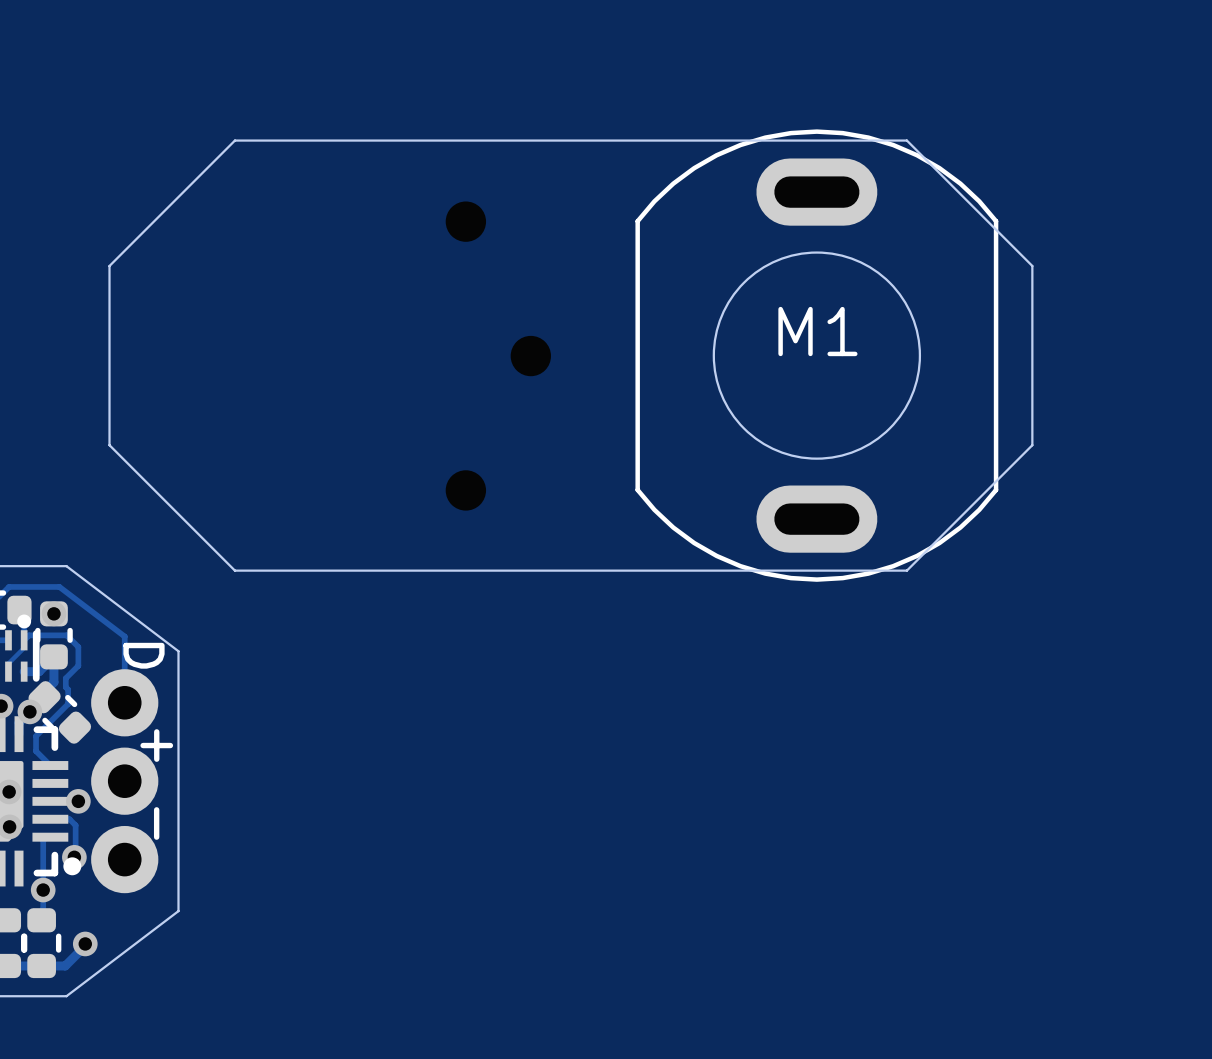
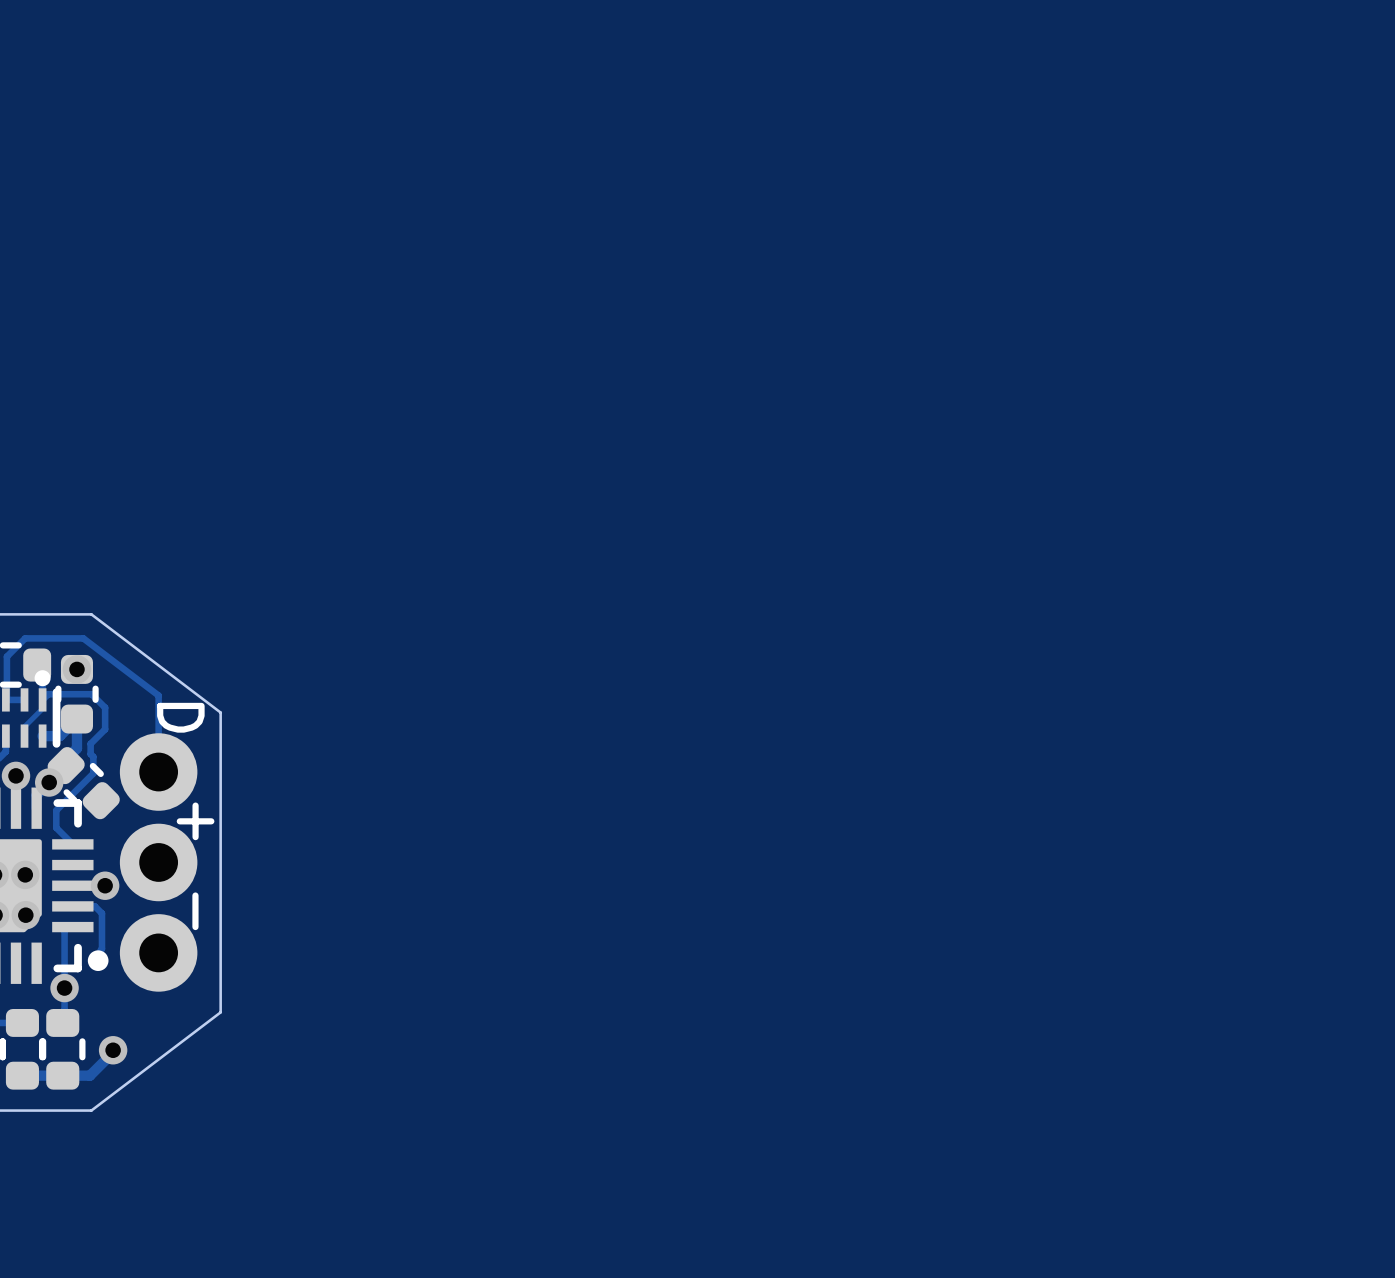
drawing: [108, 139, 1034, 572] -> none
M1: (816, 355) -> none
part: (498, 356) -> none
via: (74, 857) -> none

